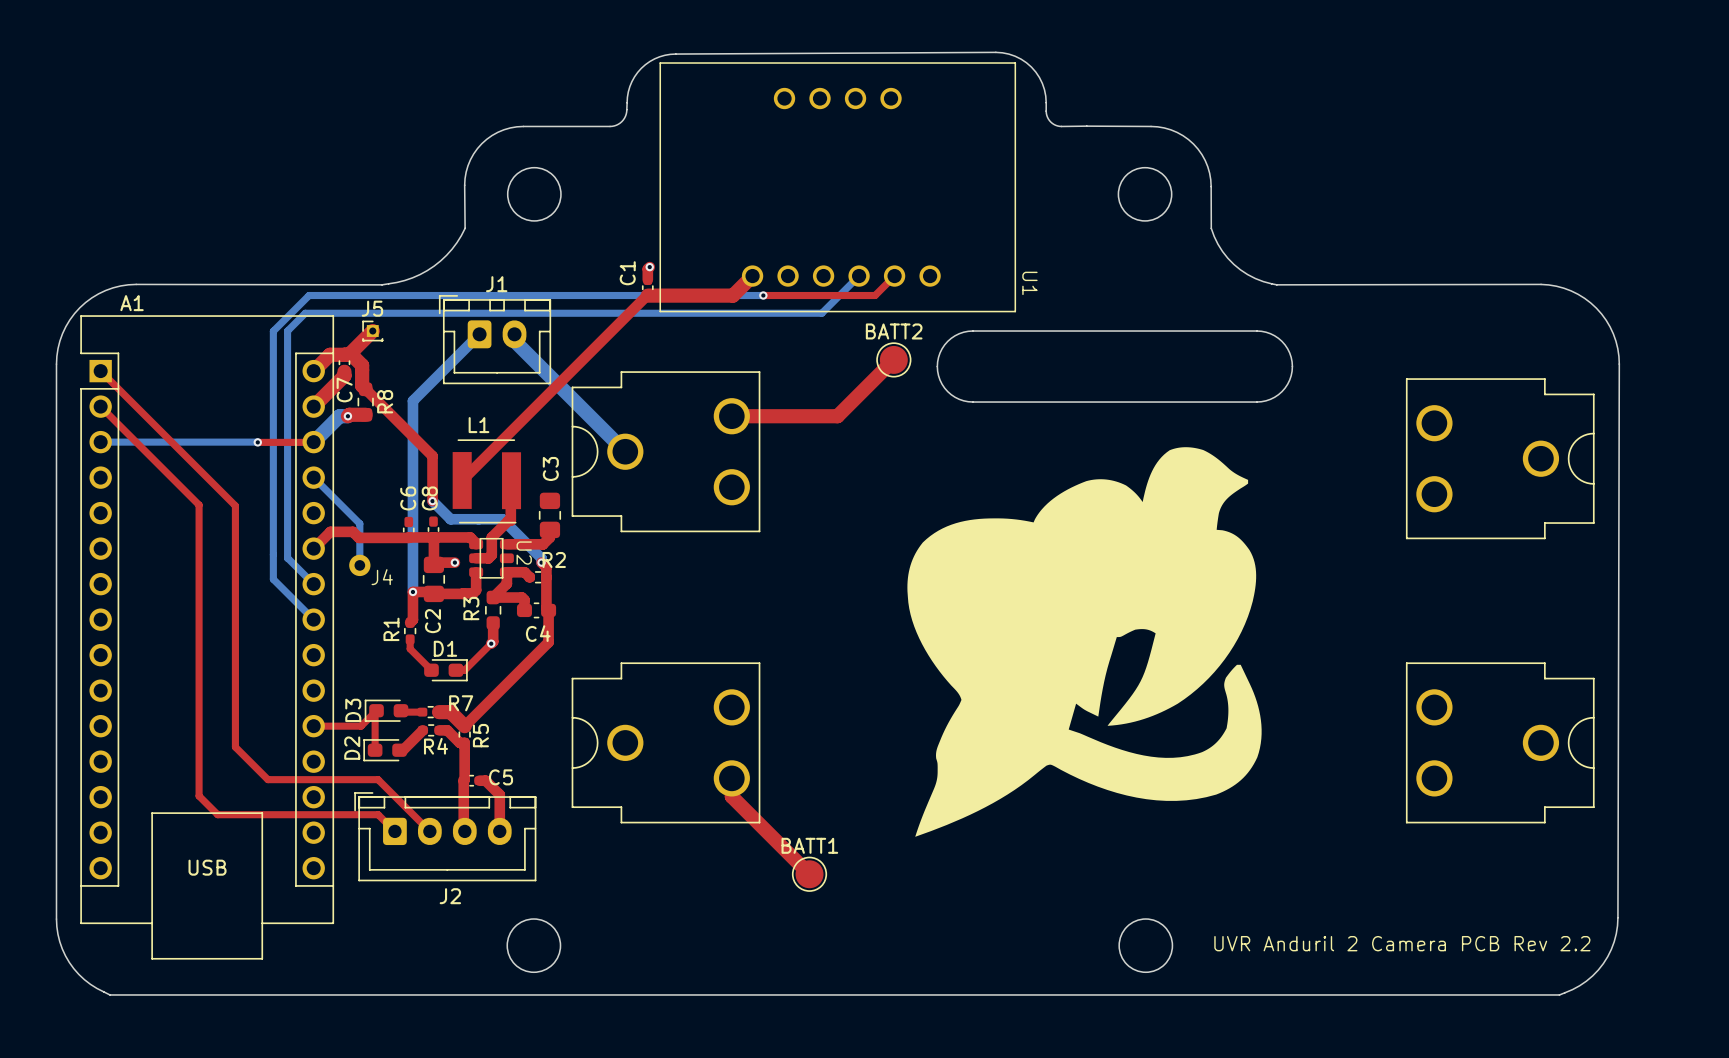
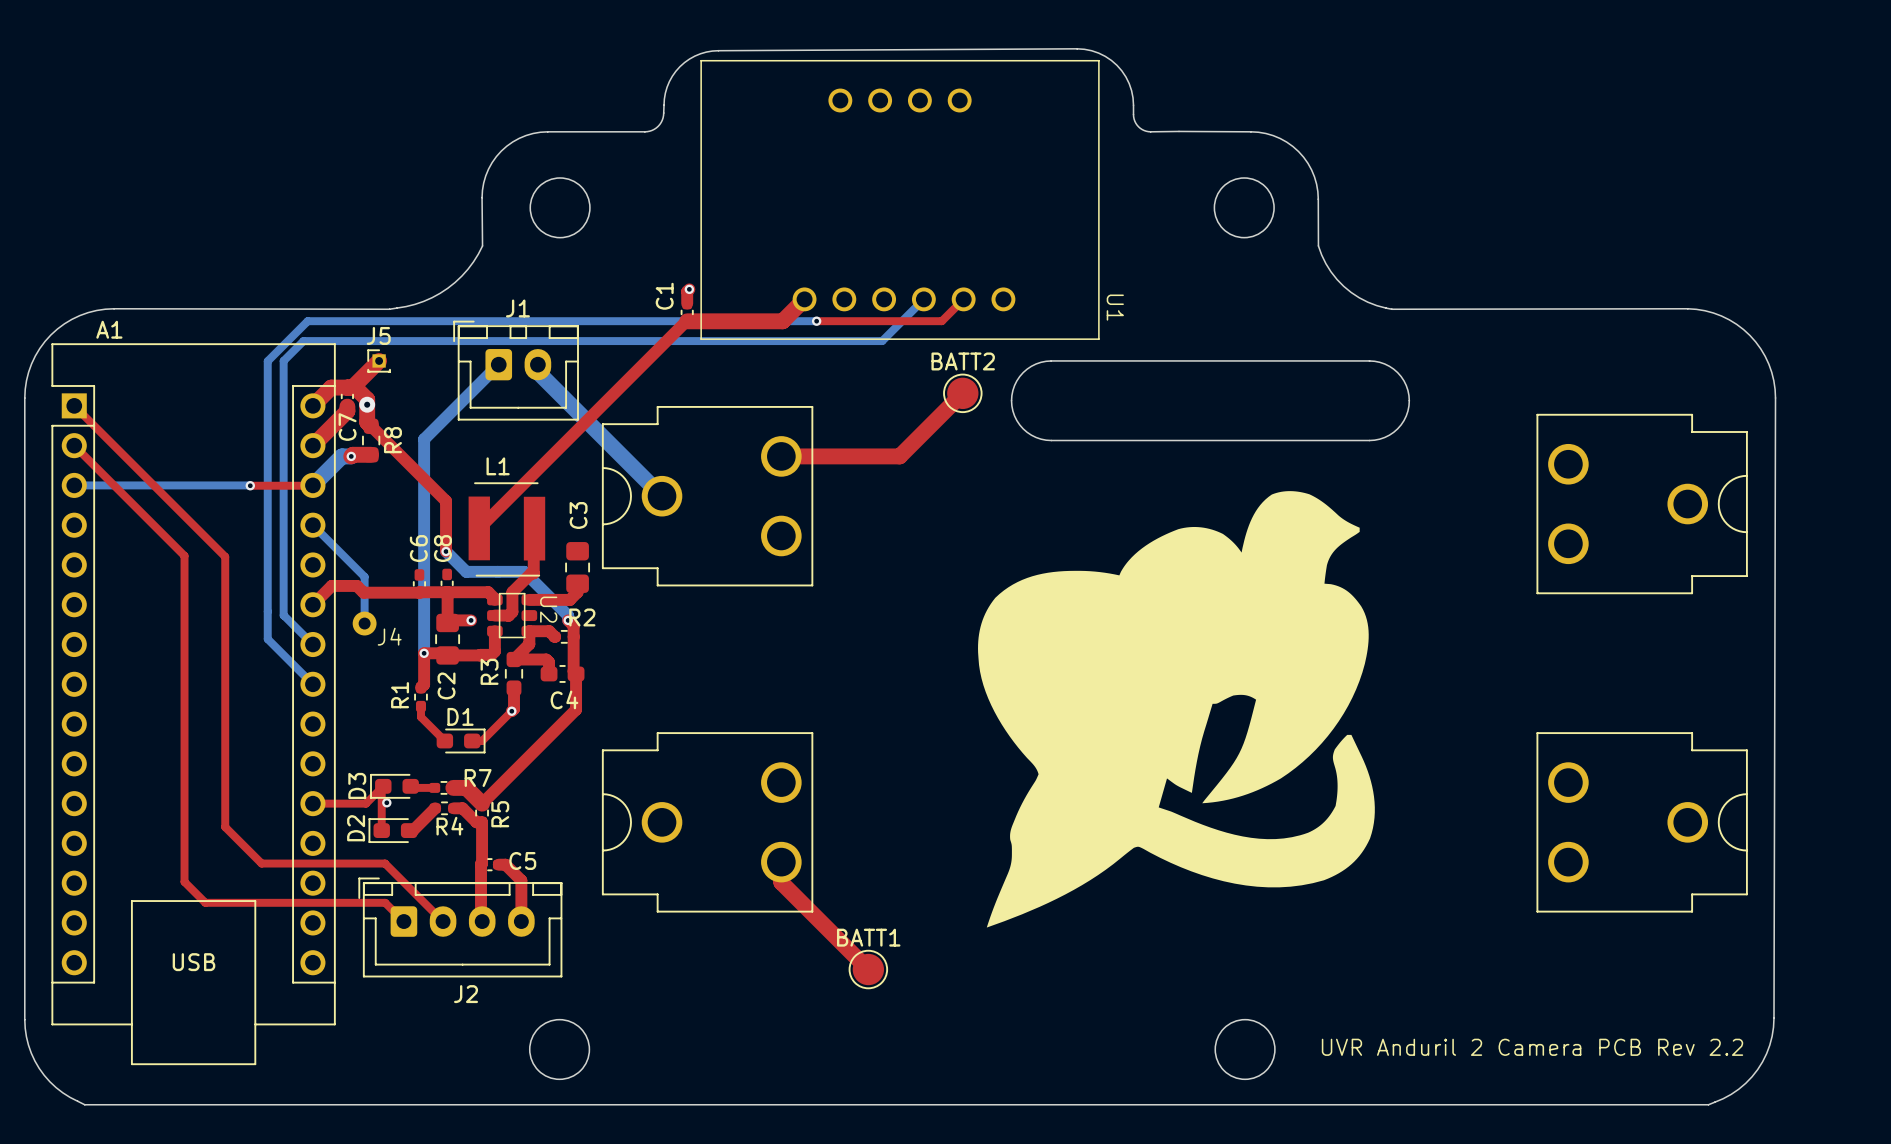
via: none -> (367, 404)
via: none -> (386, 802)

